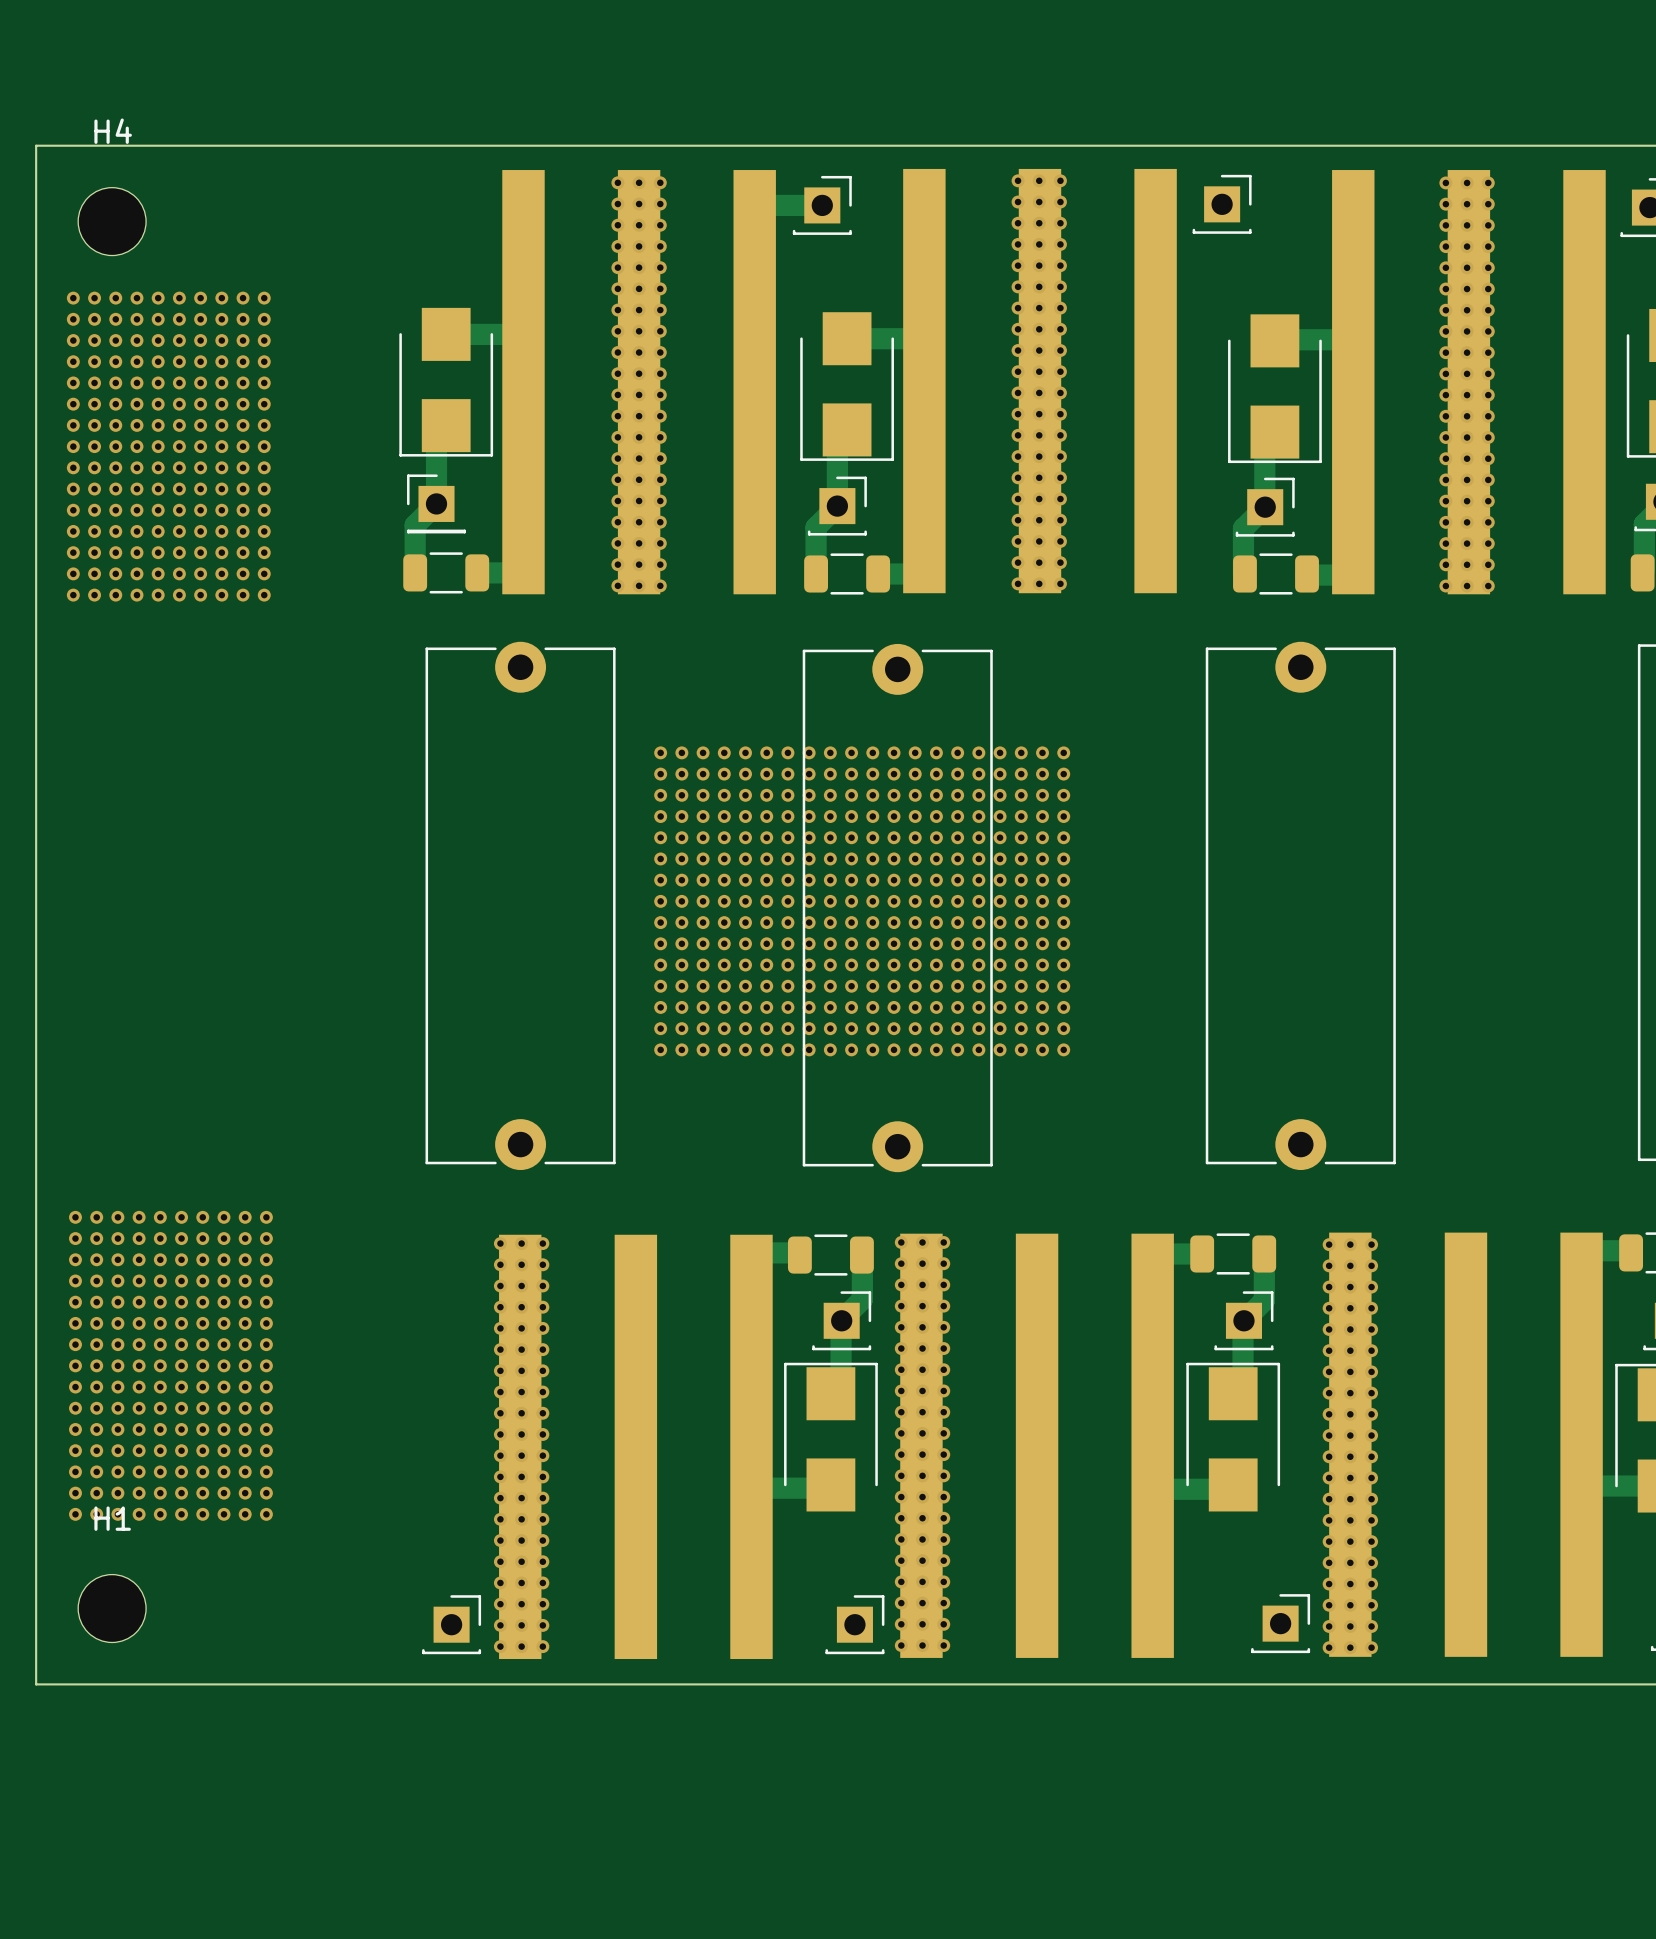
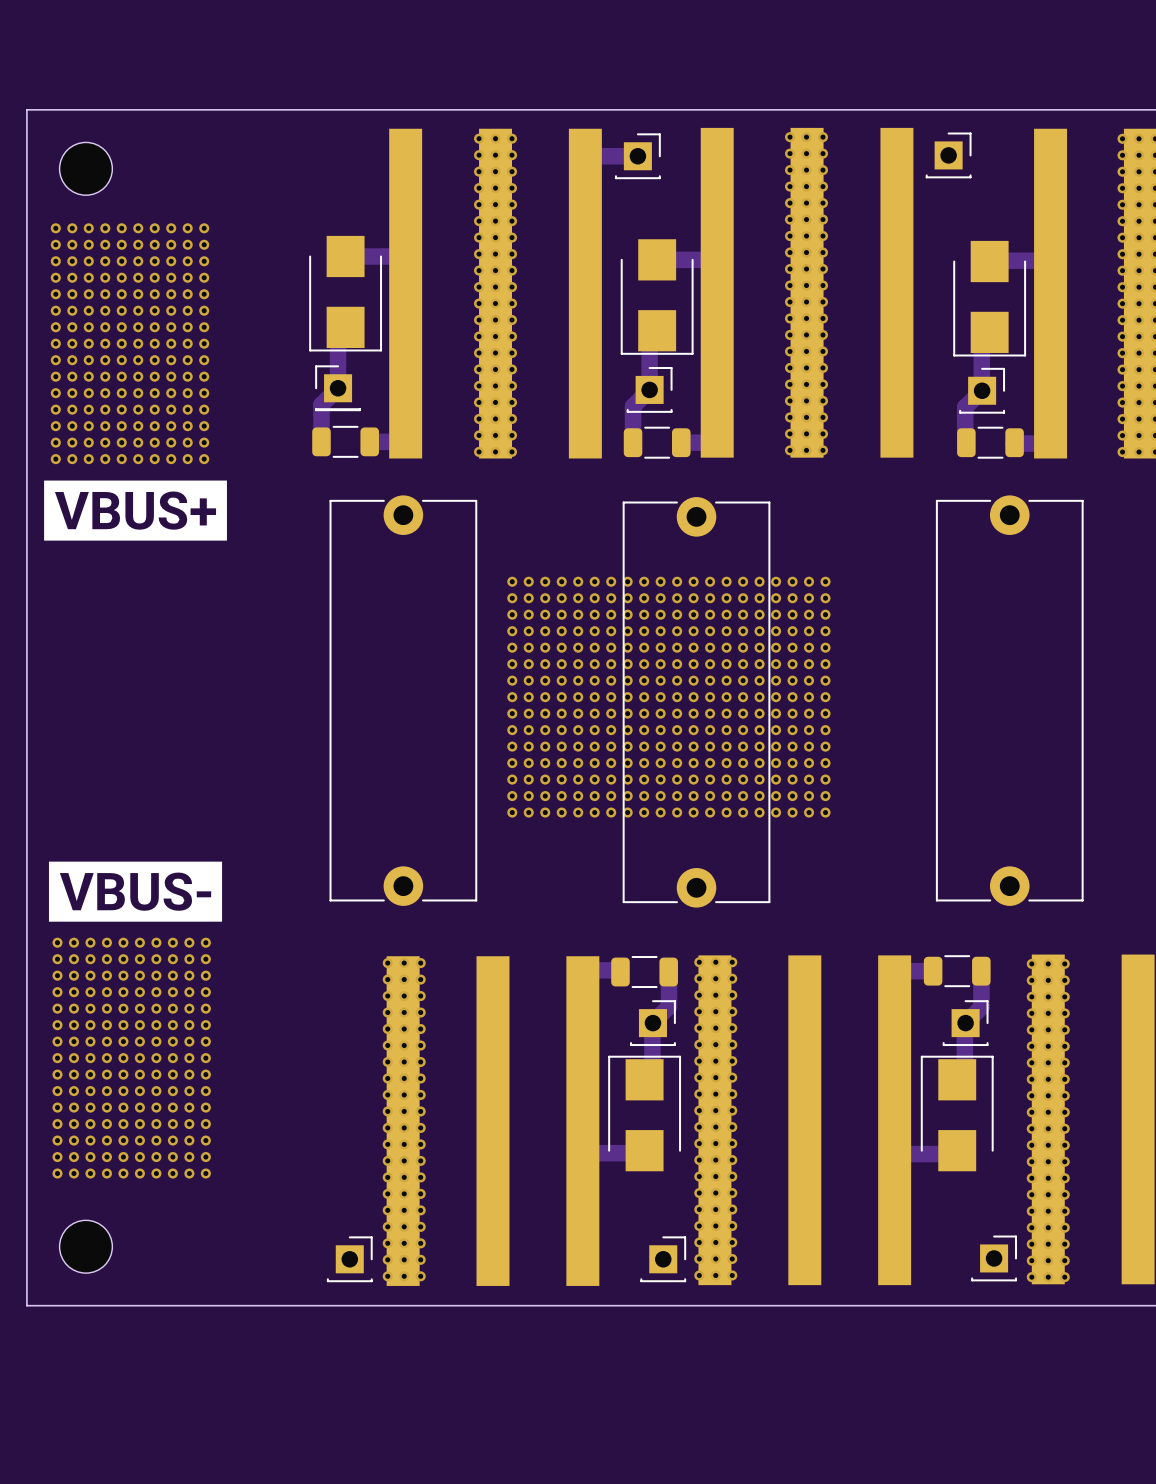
H4 name: H4 (113, 131) -> none
drawing: none -> [44, 480, 227, 541]
drawing: none -> [48, 861, 223, 922]
H1 name: H1 (112, 1518) -> none

